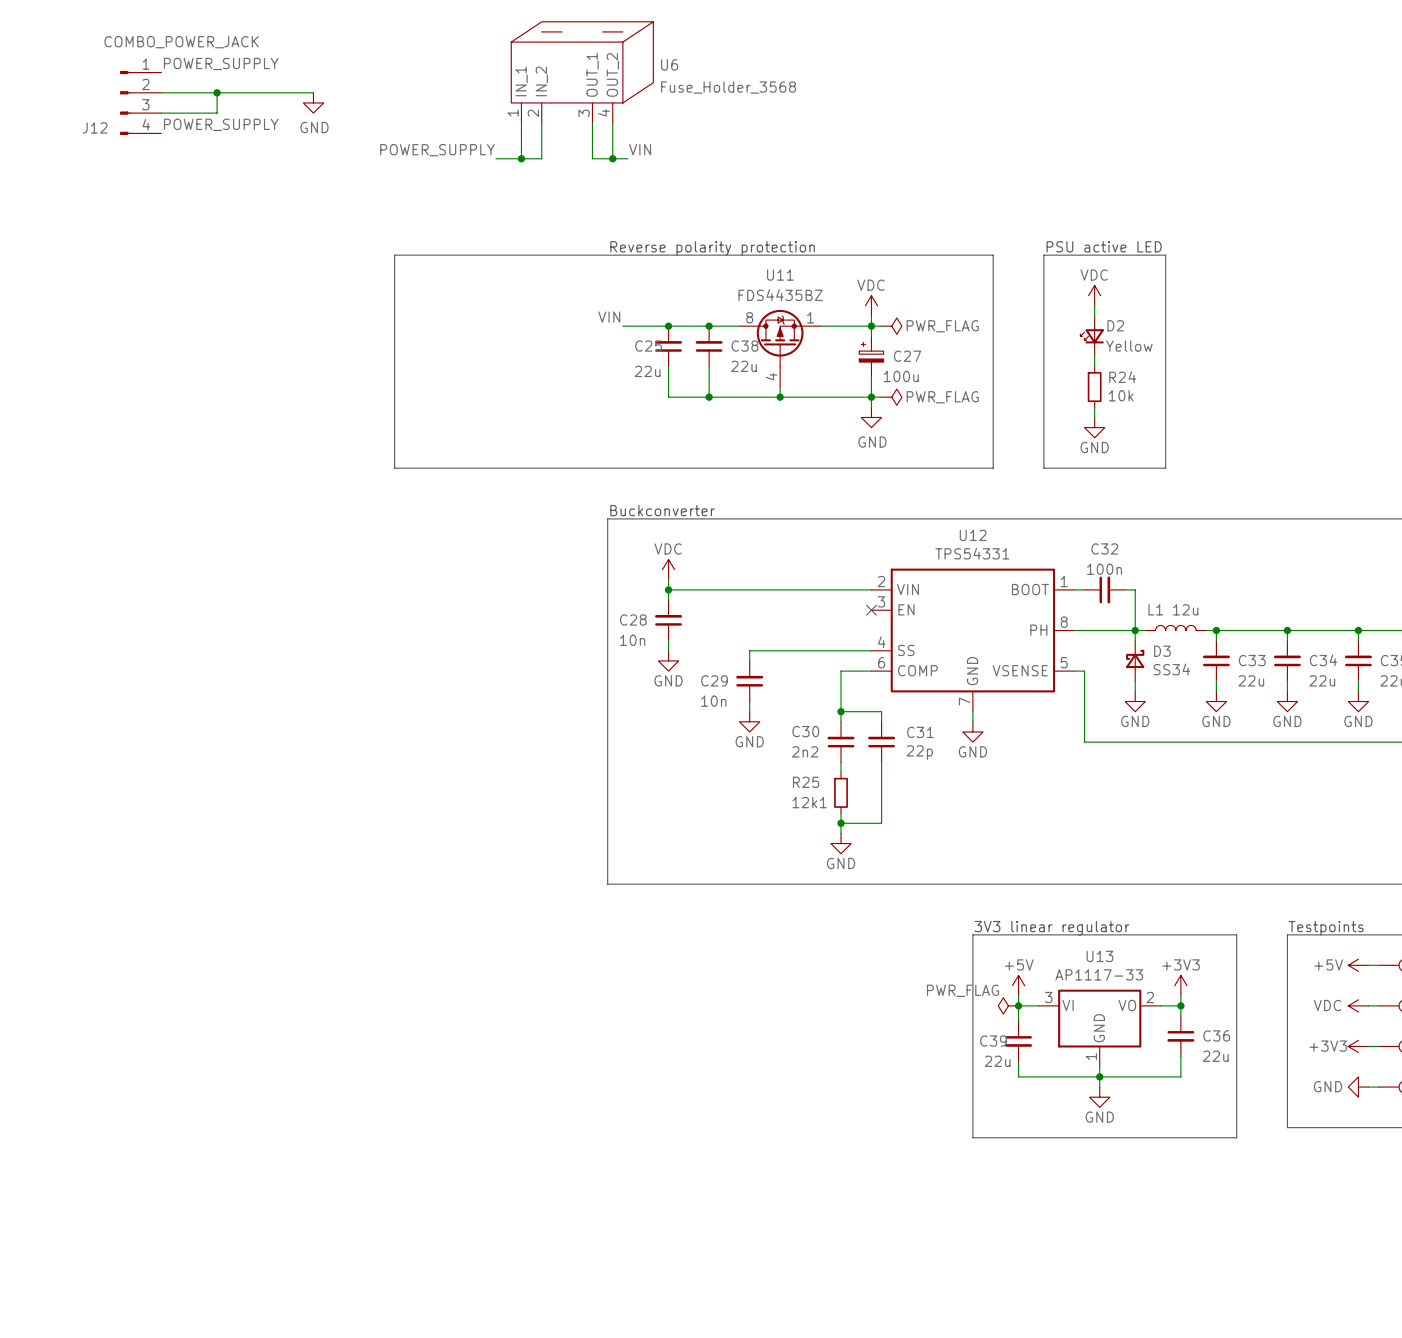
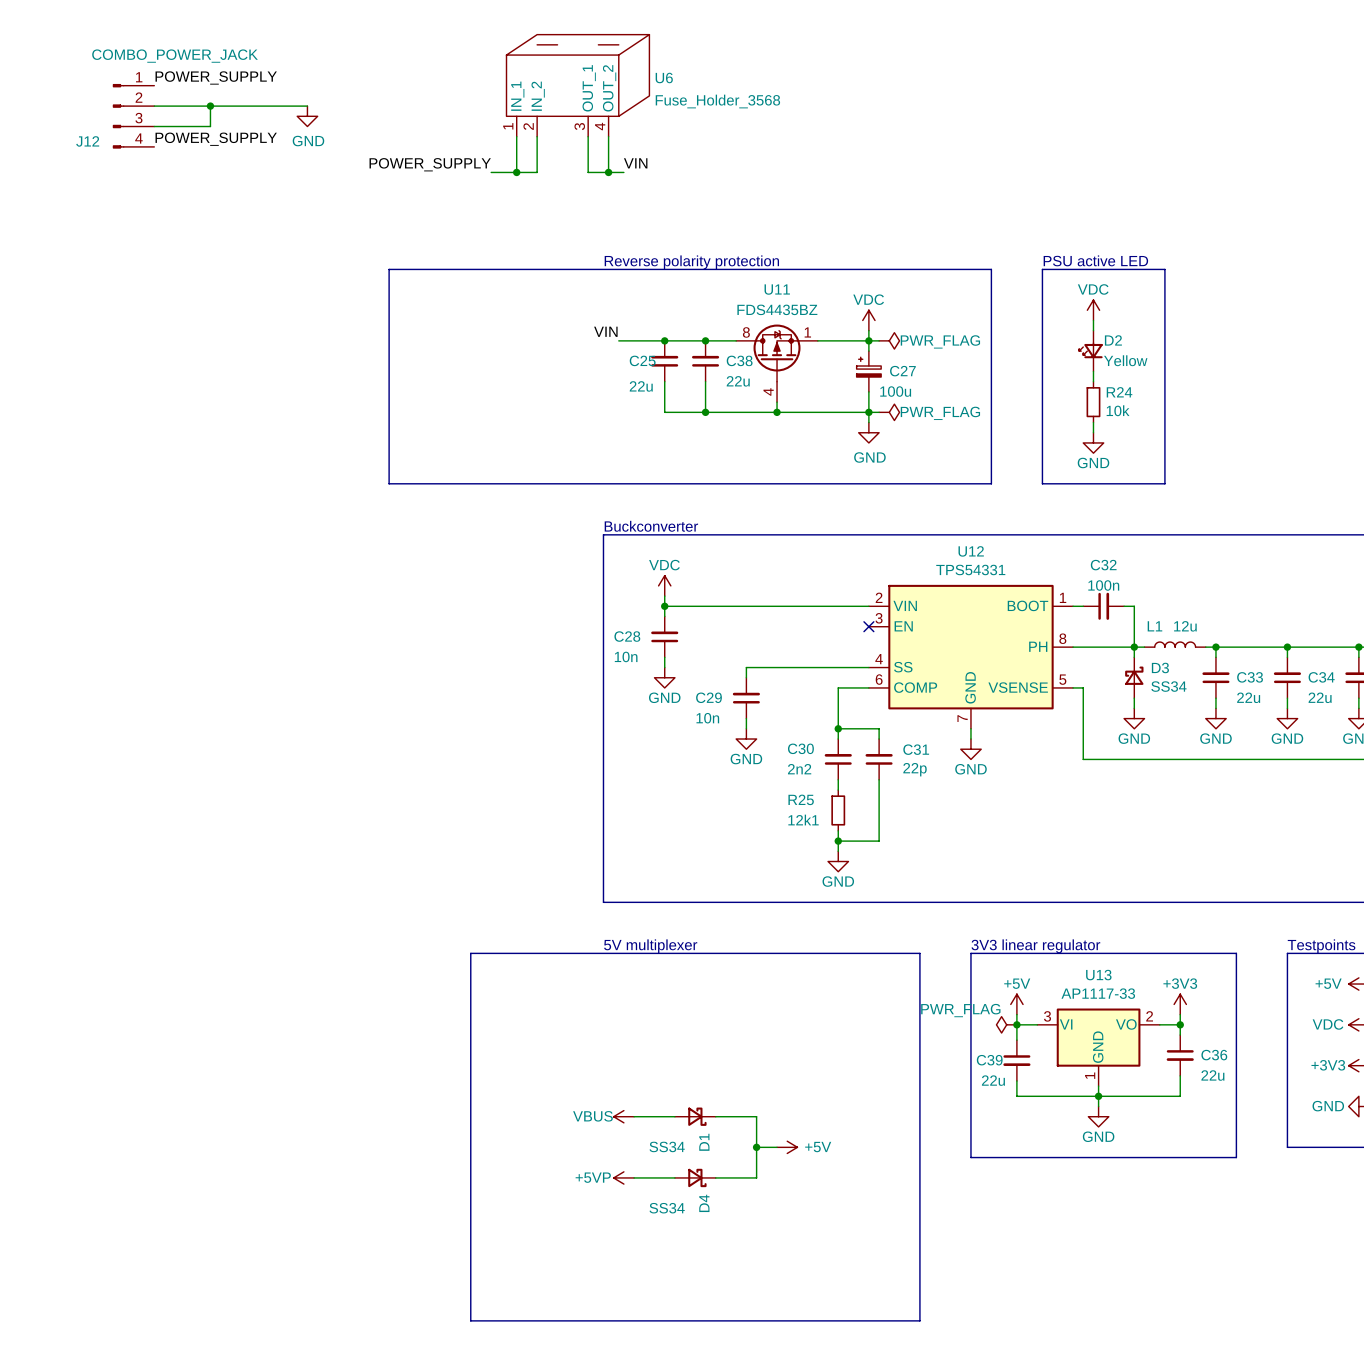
text: none -> 5V multiplexer (650, 946)
line: none -> (470, 953) (919, 953) (919, 1320) (470, 1320) (470, 953)
power symbol: none -> VBUS (623, 1116)
wire: none -> (634, 1116) (674, 1116)
D1: none -> SS34 (695, 1116)
wire: none -> (715, 1116) (756, 1116) (756, 1177) (715, 1177)
wire: none -> (756, 1147) (777, 1147)
junction: none -> (756, 1147)
power symbol: none -> +5V (787, 1147)
power symbol: none -> +5VP (623, 1177)
wire: none -> (634, 1177) (674, 1177)
D4: none -> SS34 (695, 1177)

